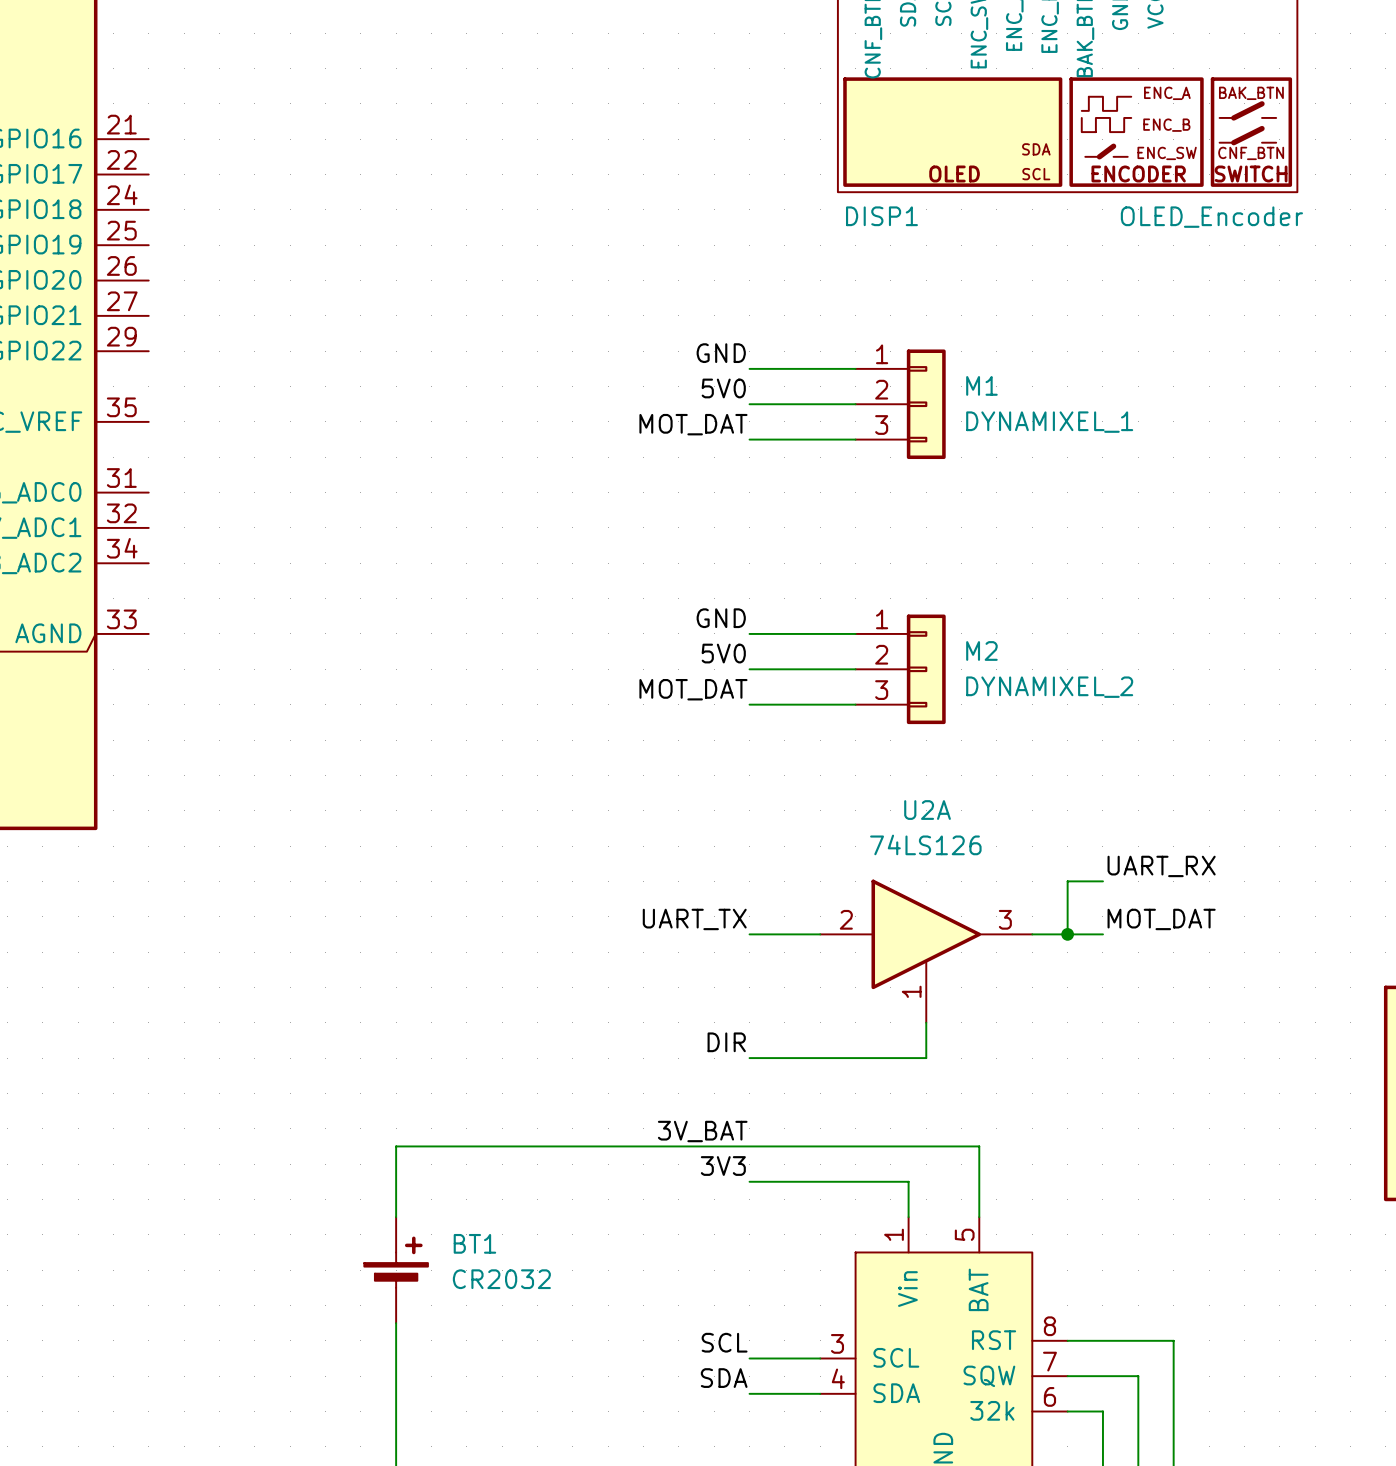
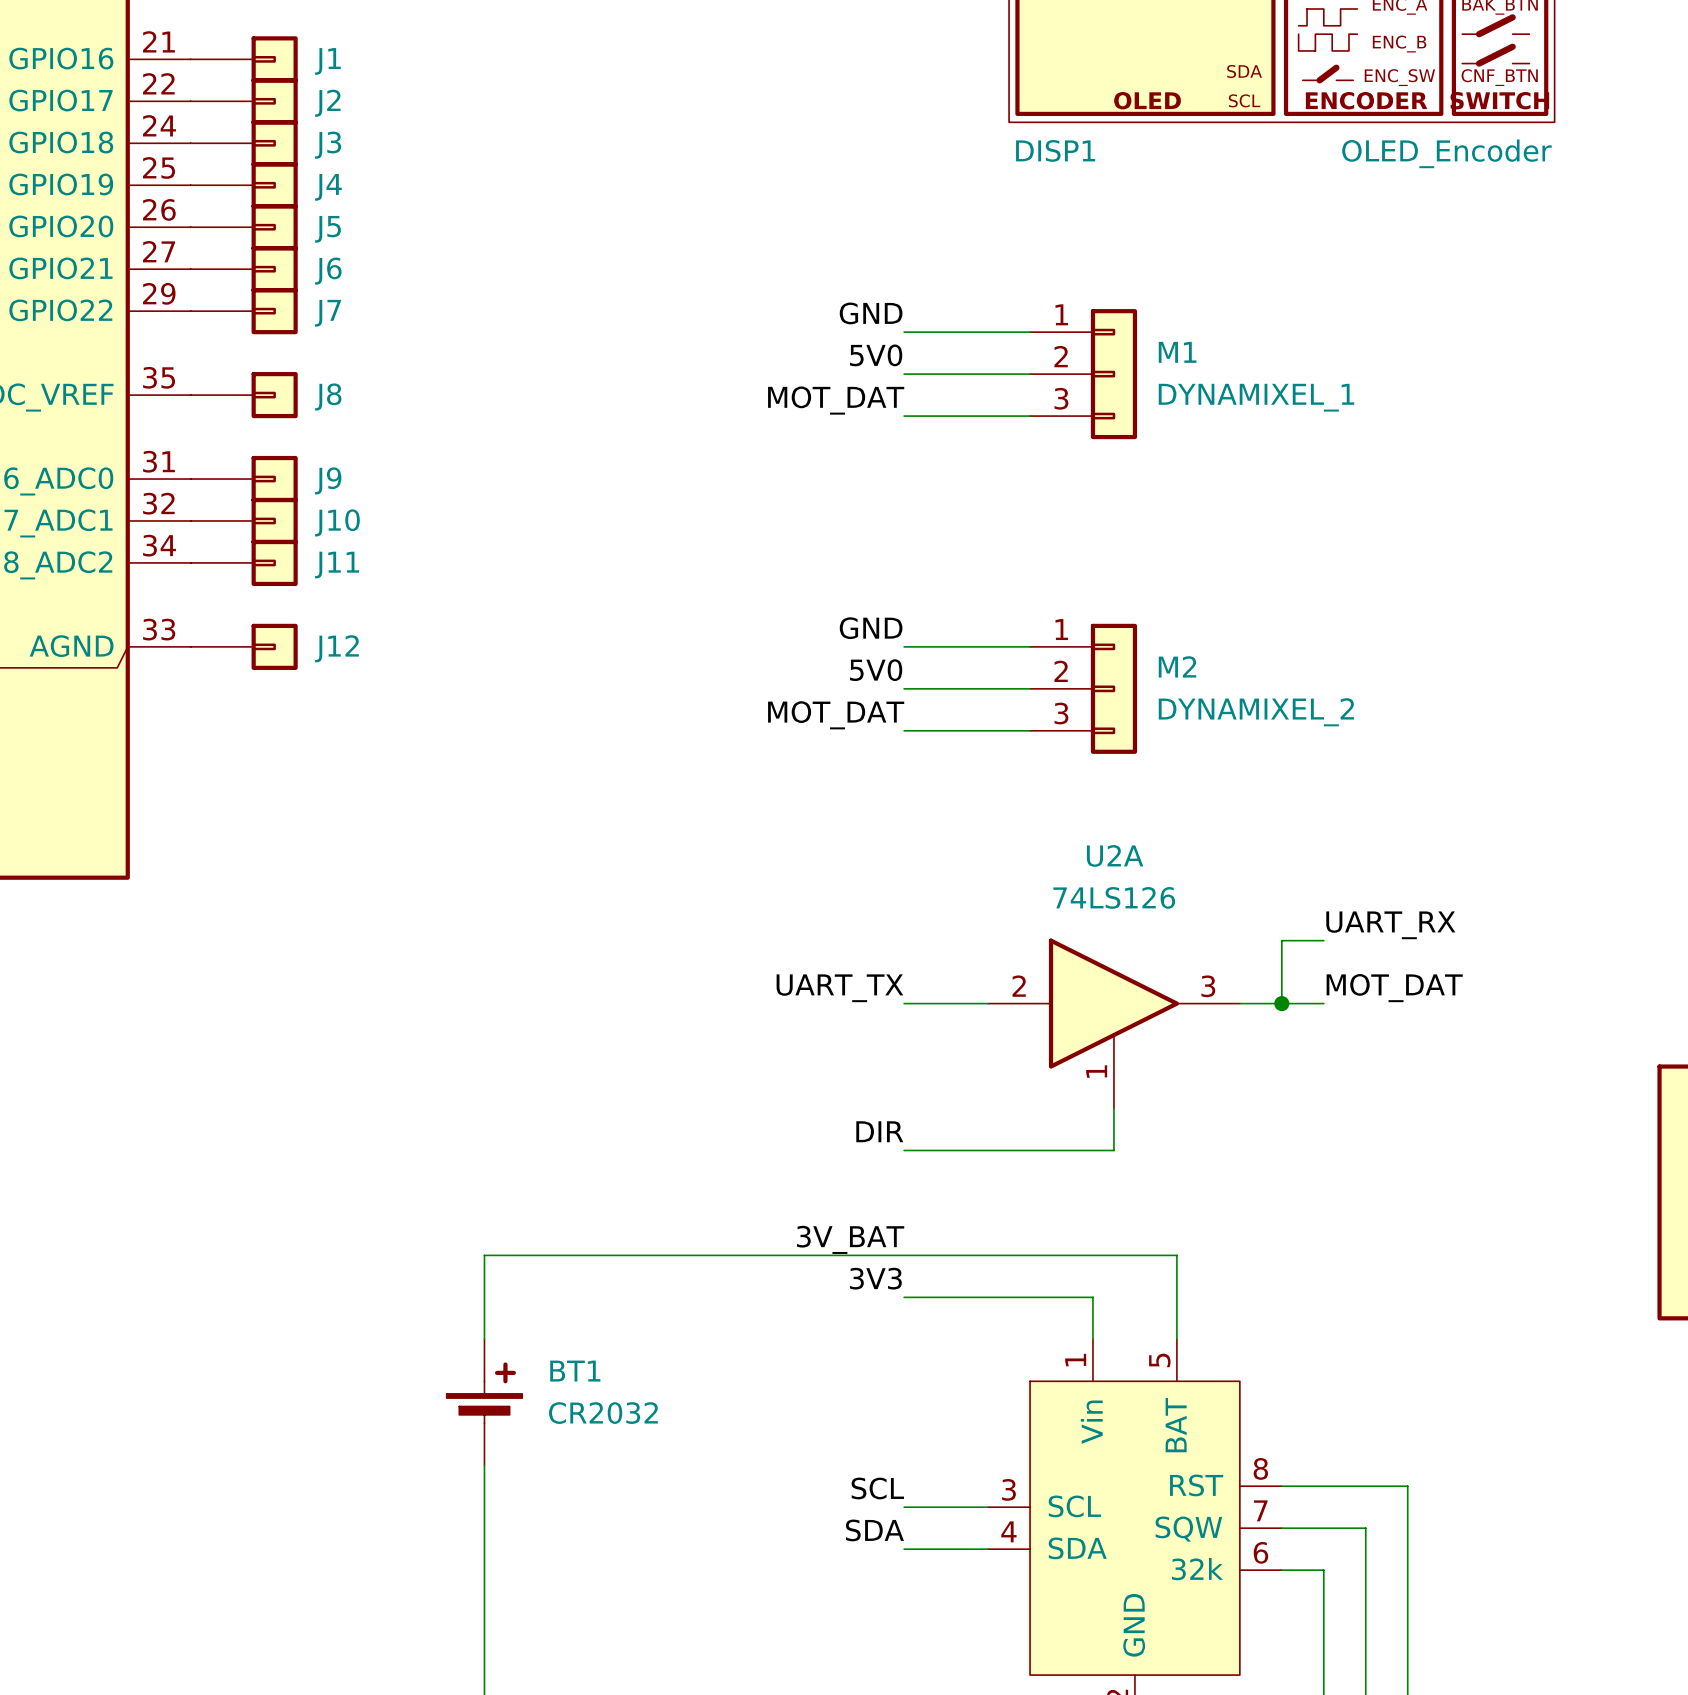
J1: none -> (244, 59)
J2: none -> (244, 101)
J3: none -> (244, 143)
J4: none -> (244, 185)
J5: none -> (244, 227)
J6: none -> (244, 269)
J7: none -> (244, 311)
J8: none -> (244, 395)
J9: none -> (244, 479)
J10: none -> (244, 520)
J11: none -> (244, 562)
J12: none -> (244, 646)

